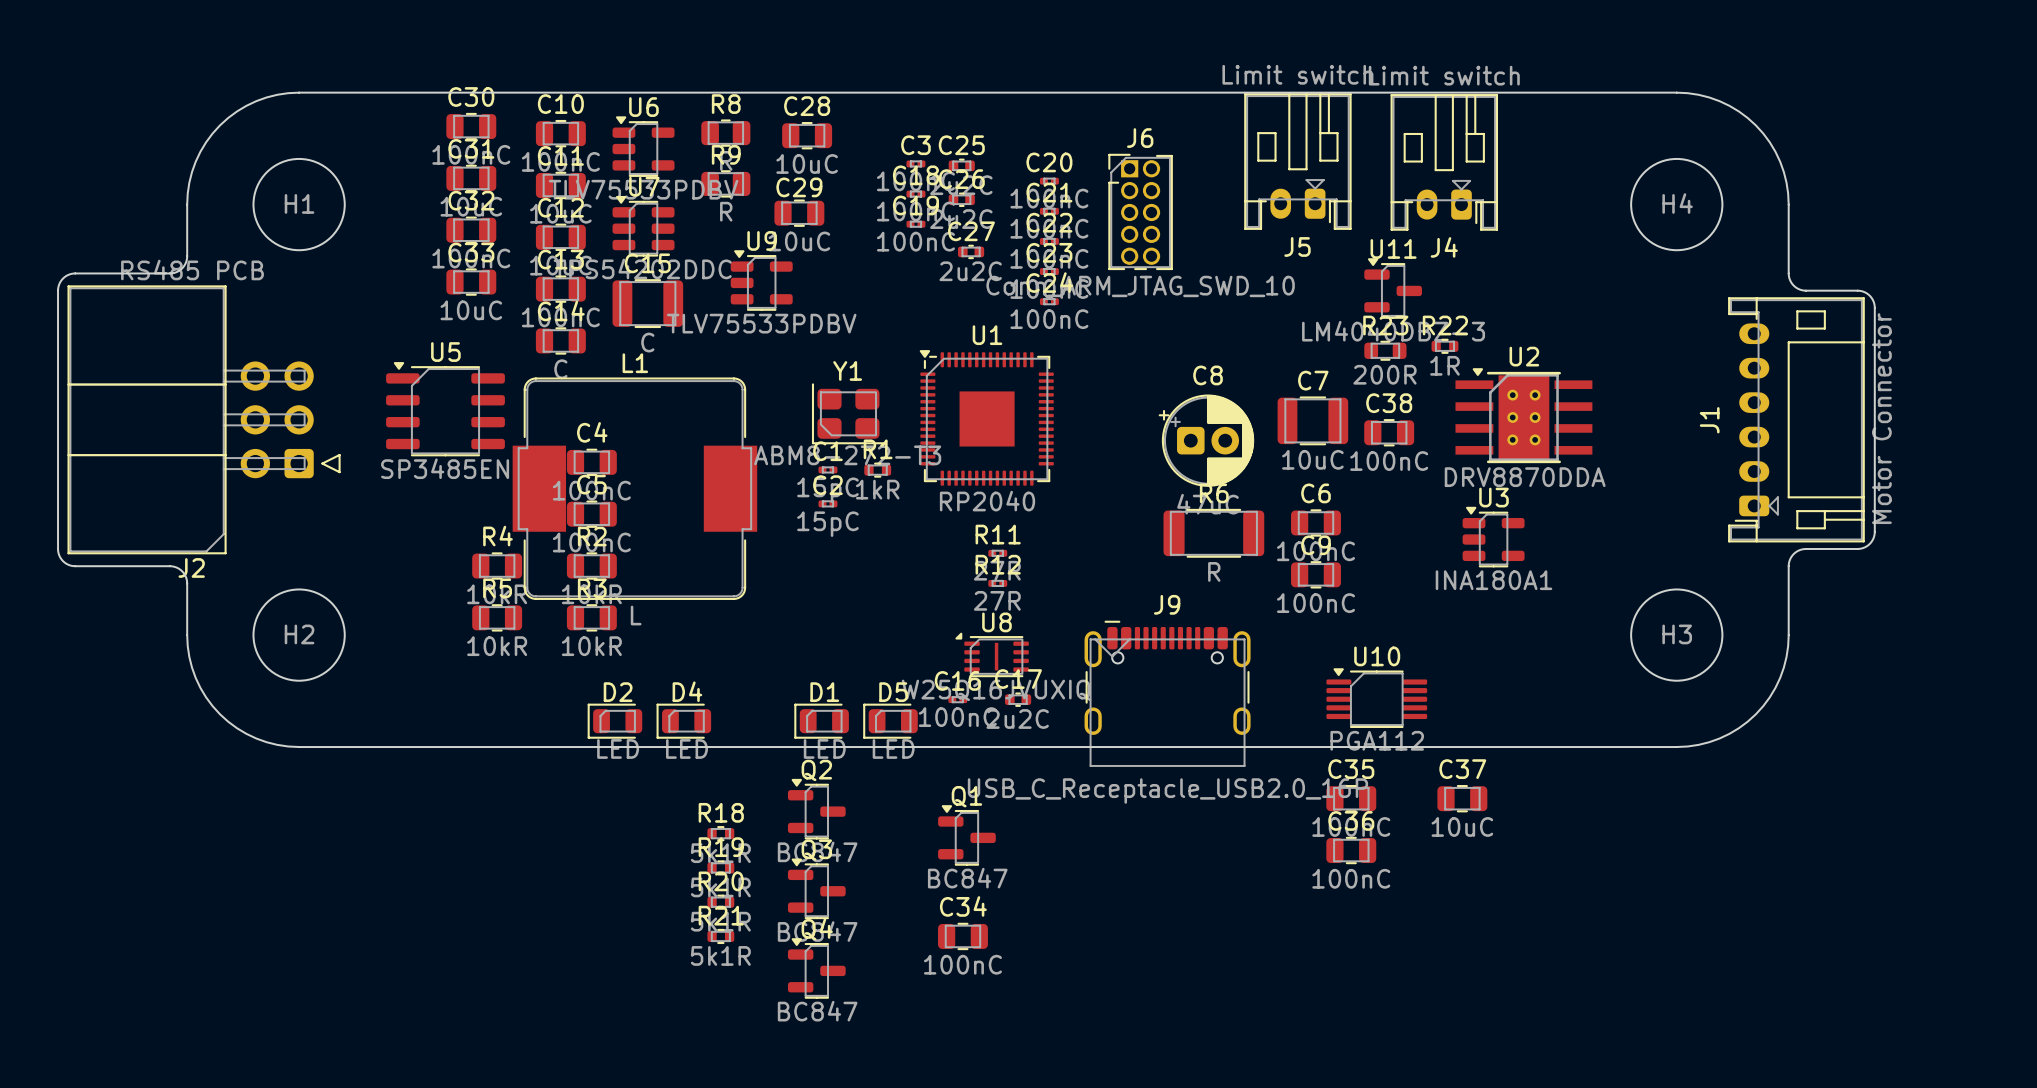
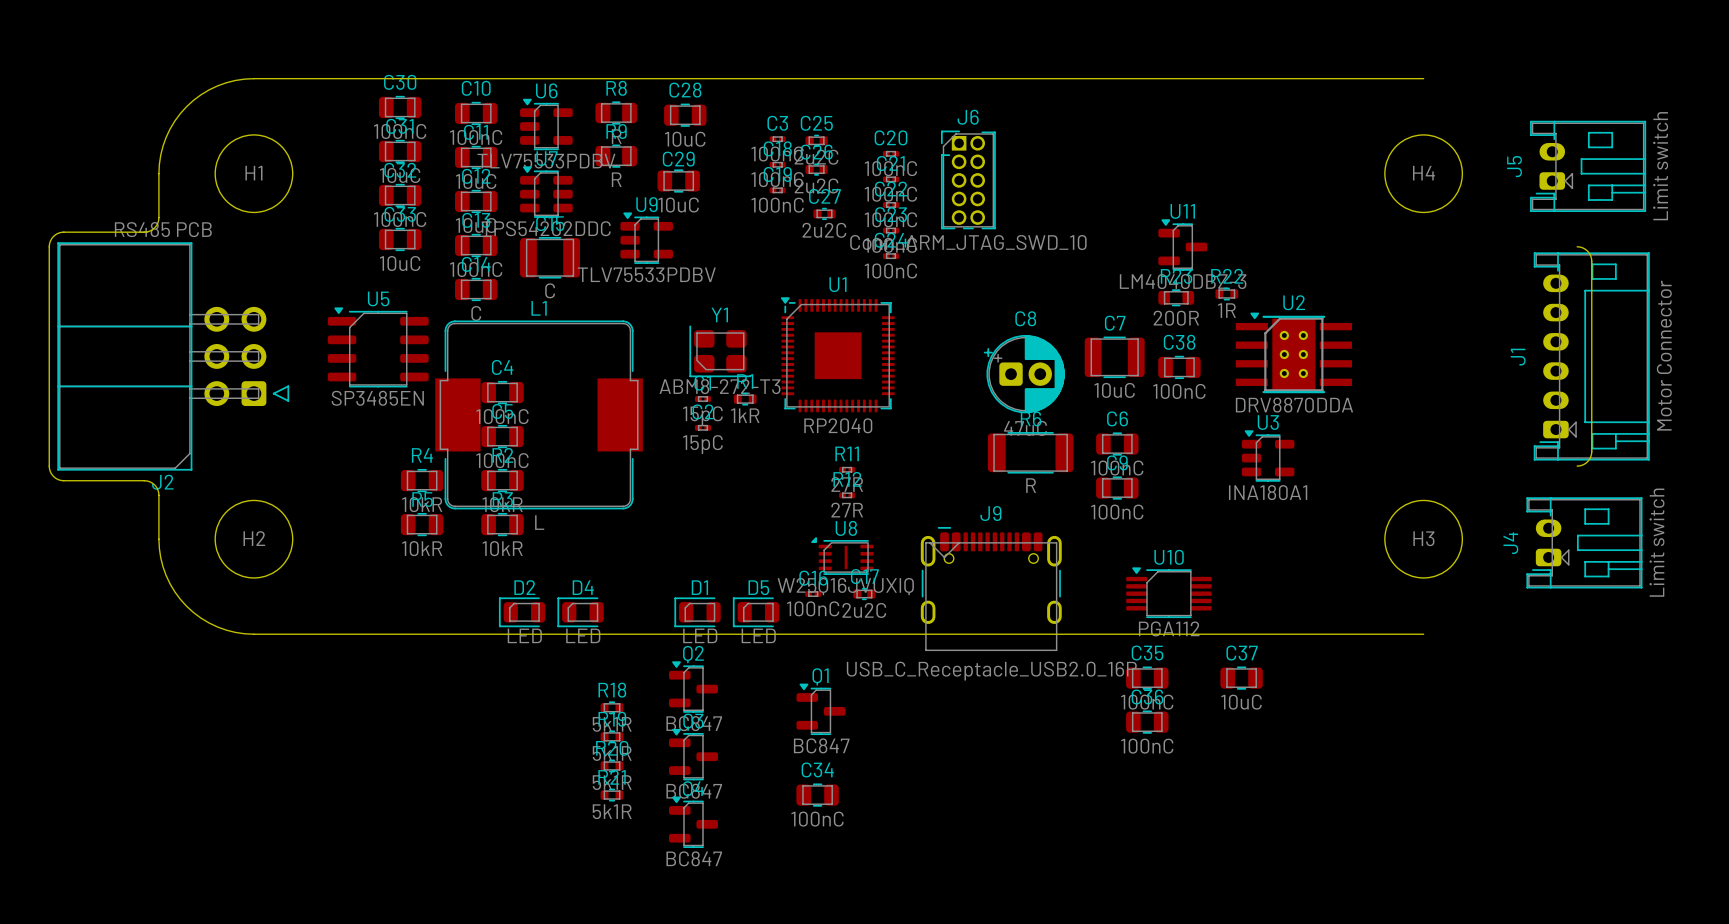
board edge: (1676, 92) (1698, 94) (1729, 105) (1747, 118) (1769, 142) (1780, 161) (1786, 182) (1788, 204) (1788, 275) (1793, 285) (1803, 290) (1857, 290) -> none
J5 rotation: 0° (1297, 161) -> 90° clockwise (1588, 166)
J5 position: (1297, 161) -> (1588, 166)
J4 rotation: 0° (1444, 162) -> 90° clockwise (1584, 542)
J4 position: (1444, 162) -> (1584, 542)
J1 position: (1796, 419) -> (1591, 356)
board edge: (1857, 548) (1803, 549) (1793, 554) (1788, 564) (1788, 635) (1786, 656) (1780, 677) (1769, 697) (1747, 721) (1729, 733) (1709, 742) (1676, 747) -> none

